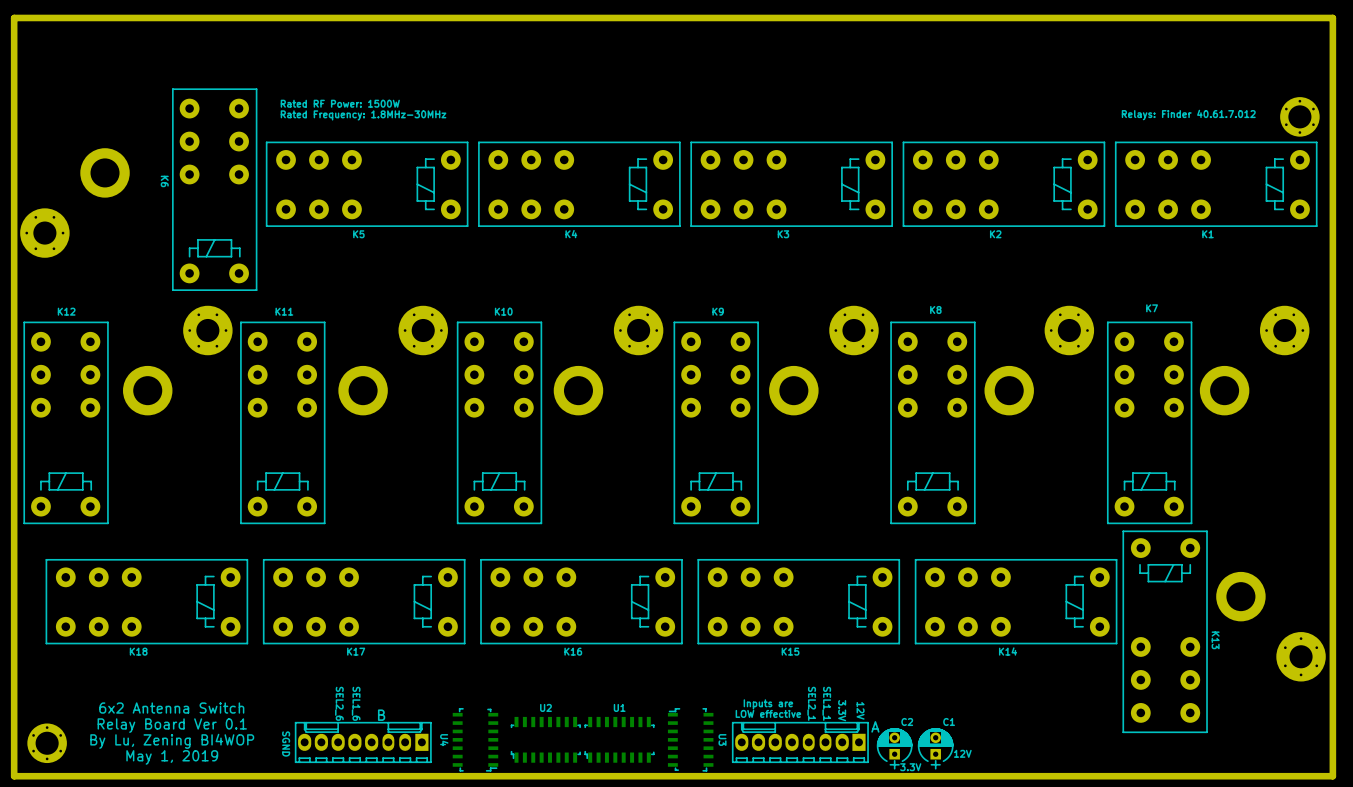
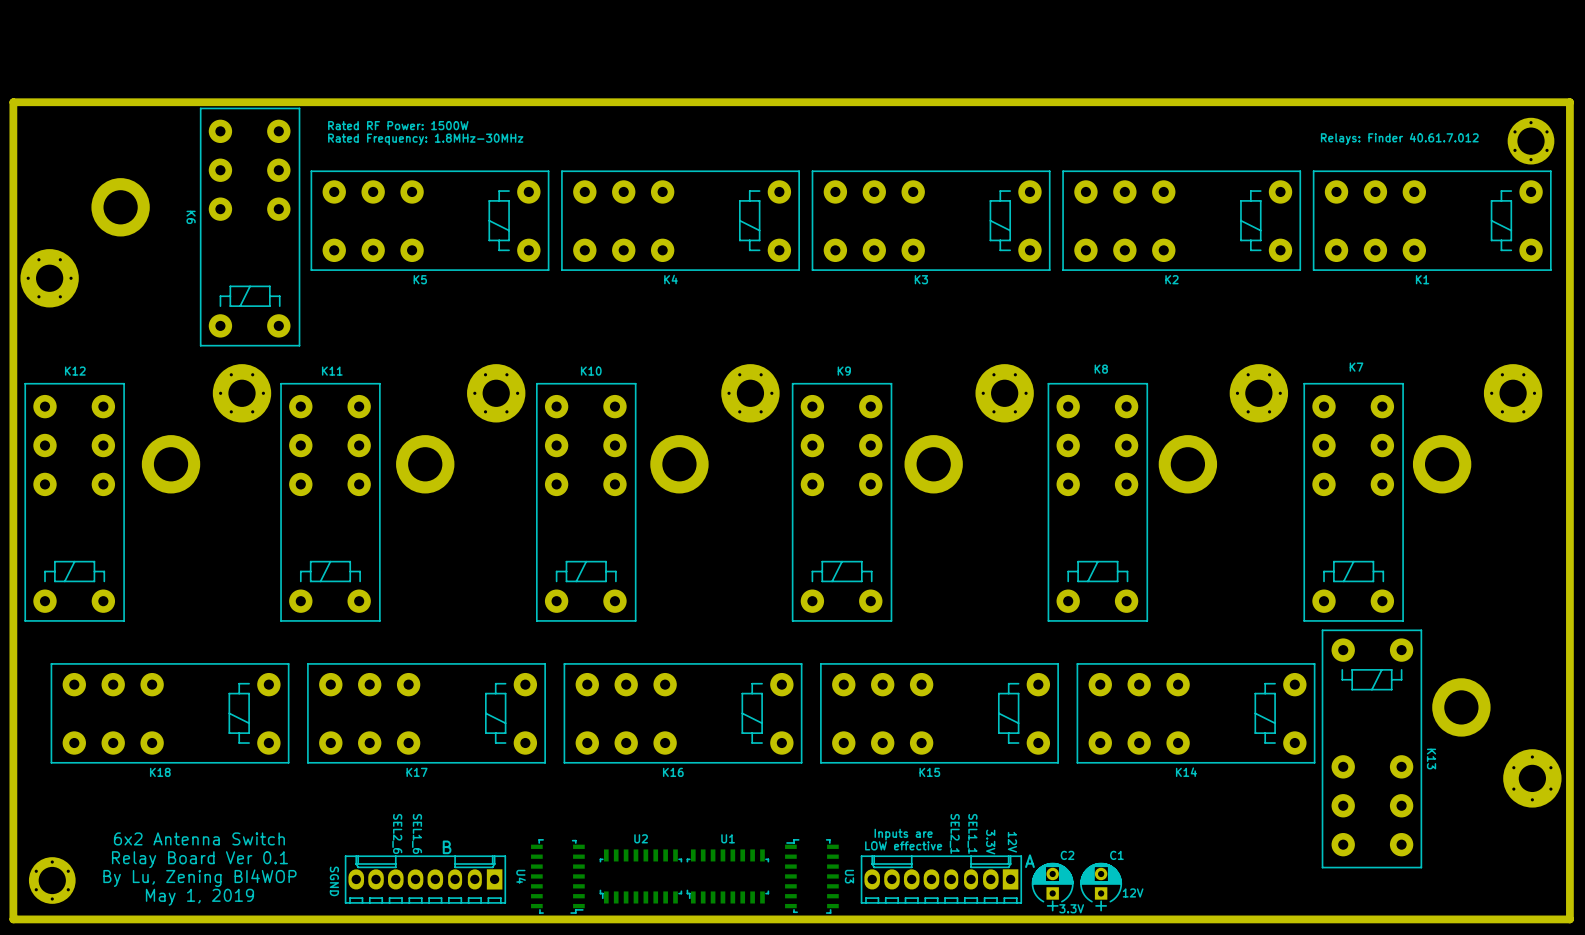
board edge: (1332, 83) (1332, 17) (14, 17) (14, 83) -> (1569, 102) (13, 102)

